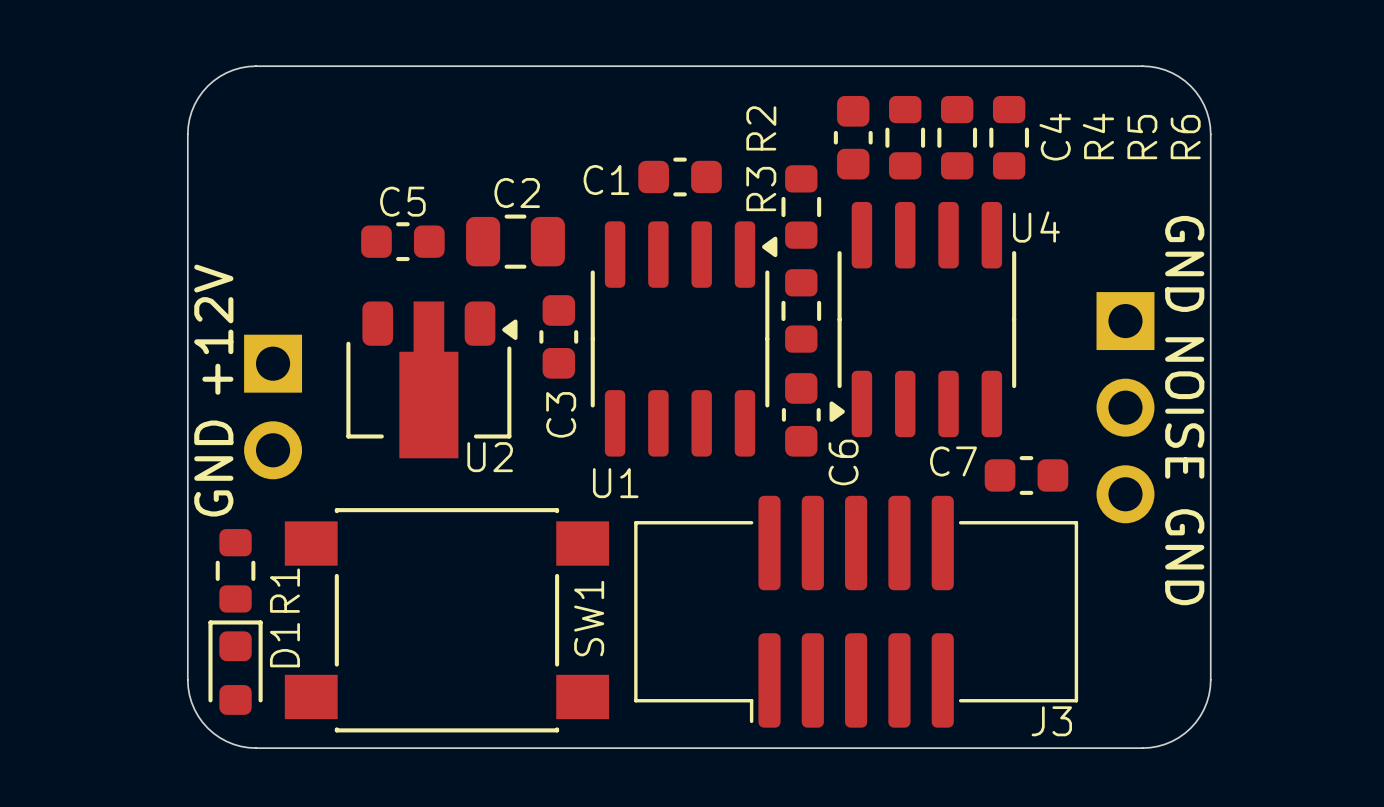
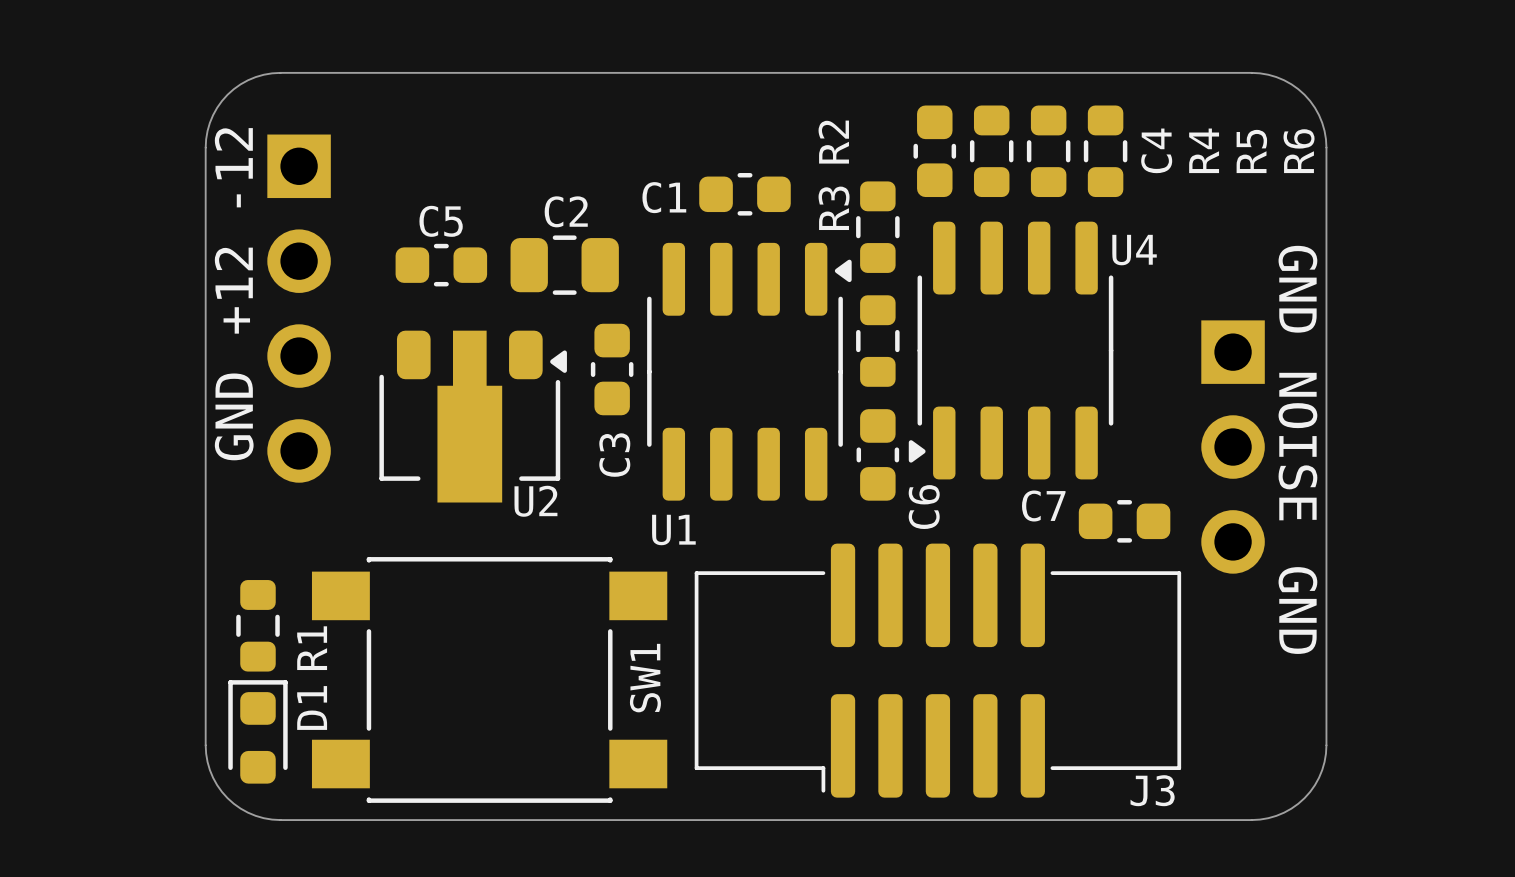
text: none -> -12 (233, 167)
part: none -> (299, 308)
text: +12V (213, 329) -> +12 (233, 290)
part: (273, 406) -> none
text position: GND (213, 468) -> GND (234, 416)

